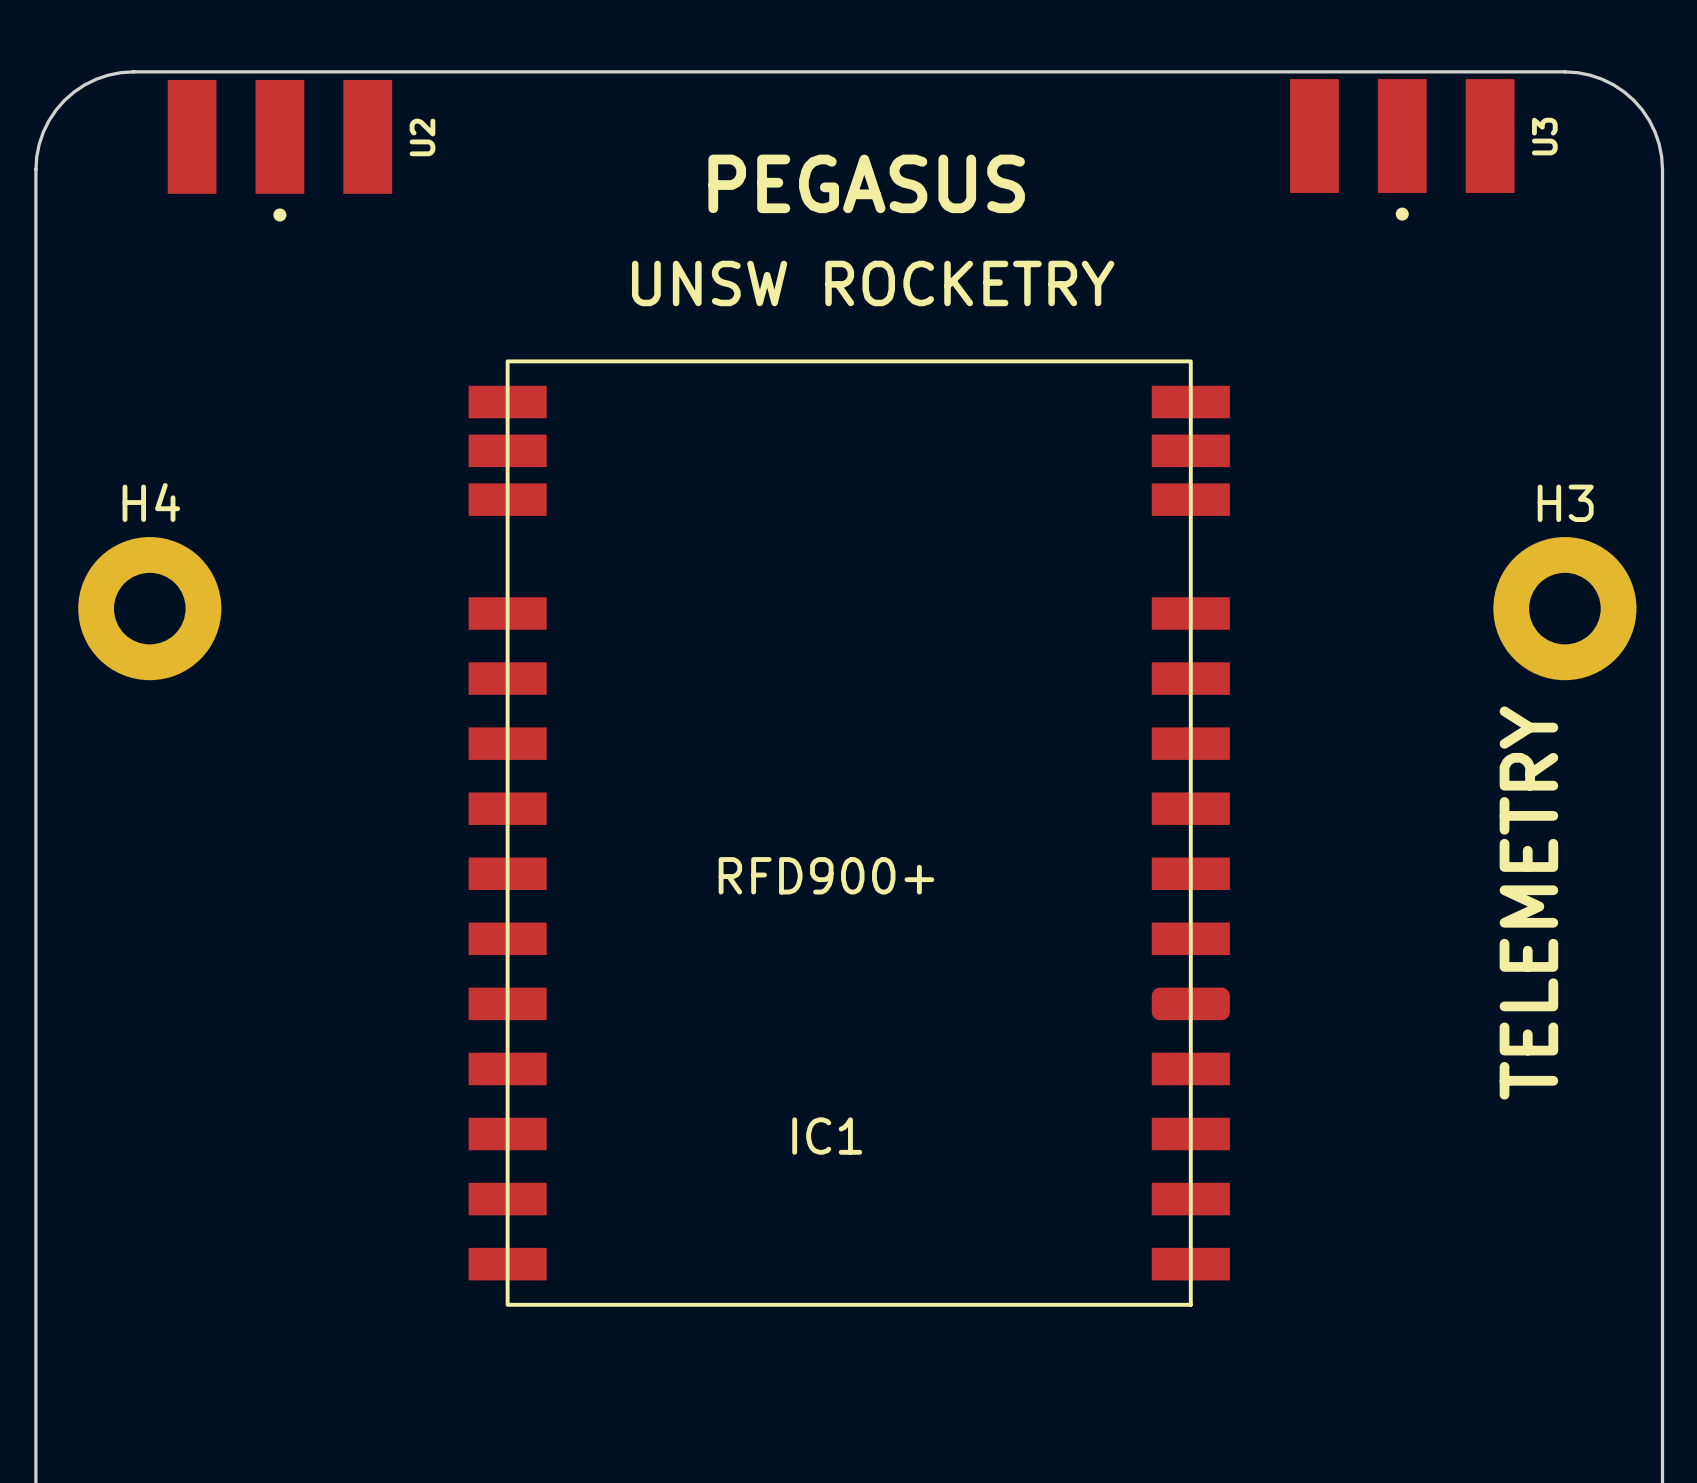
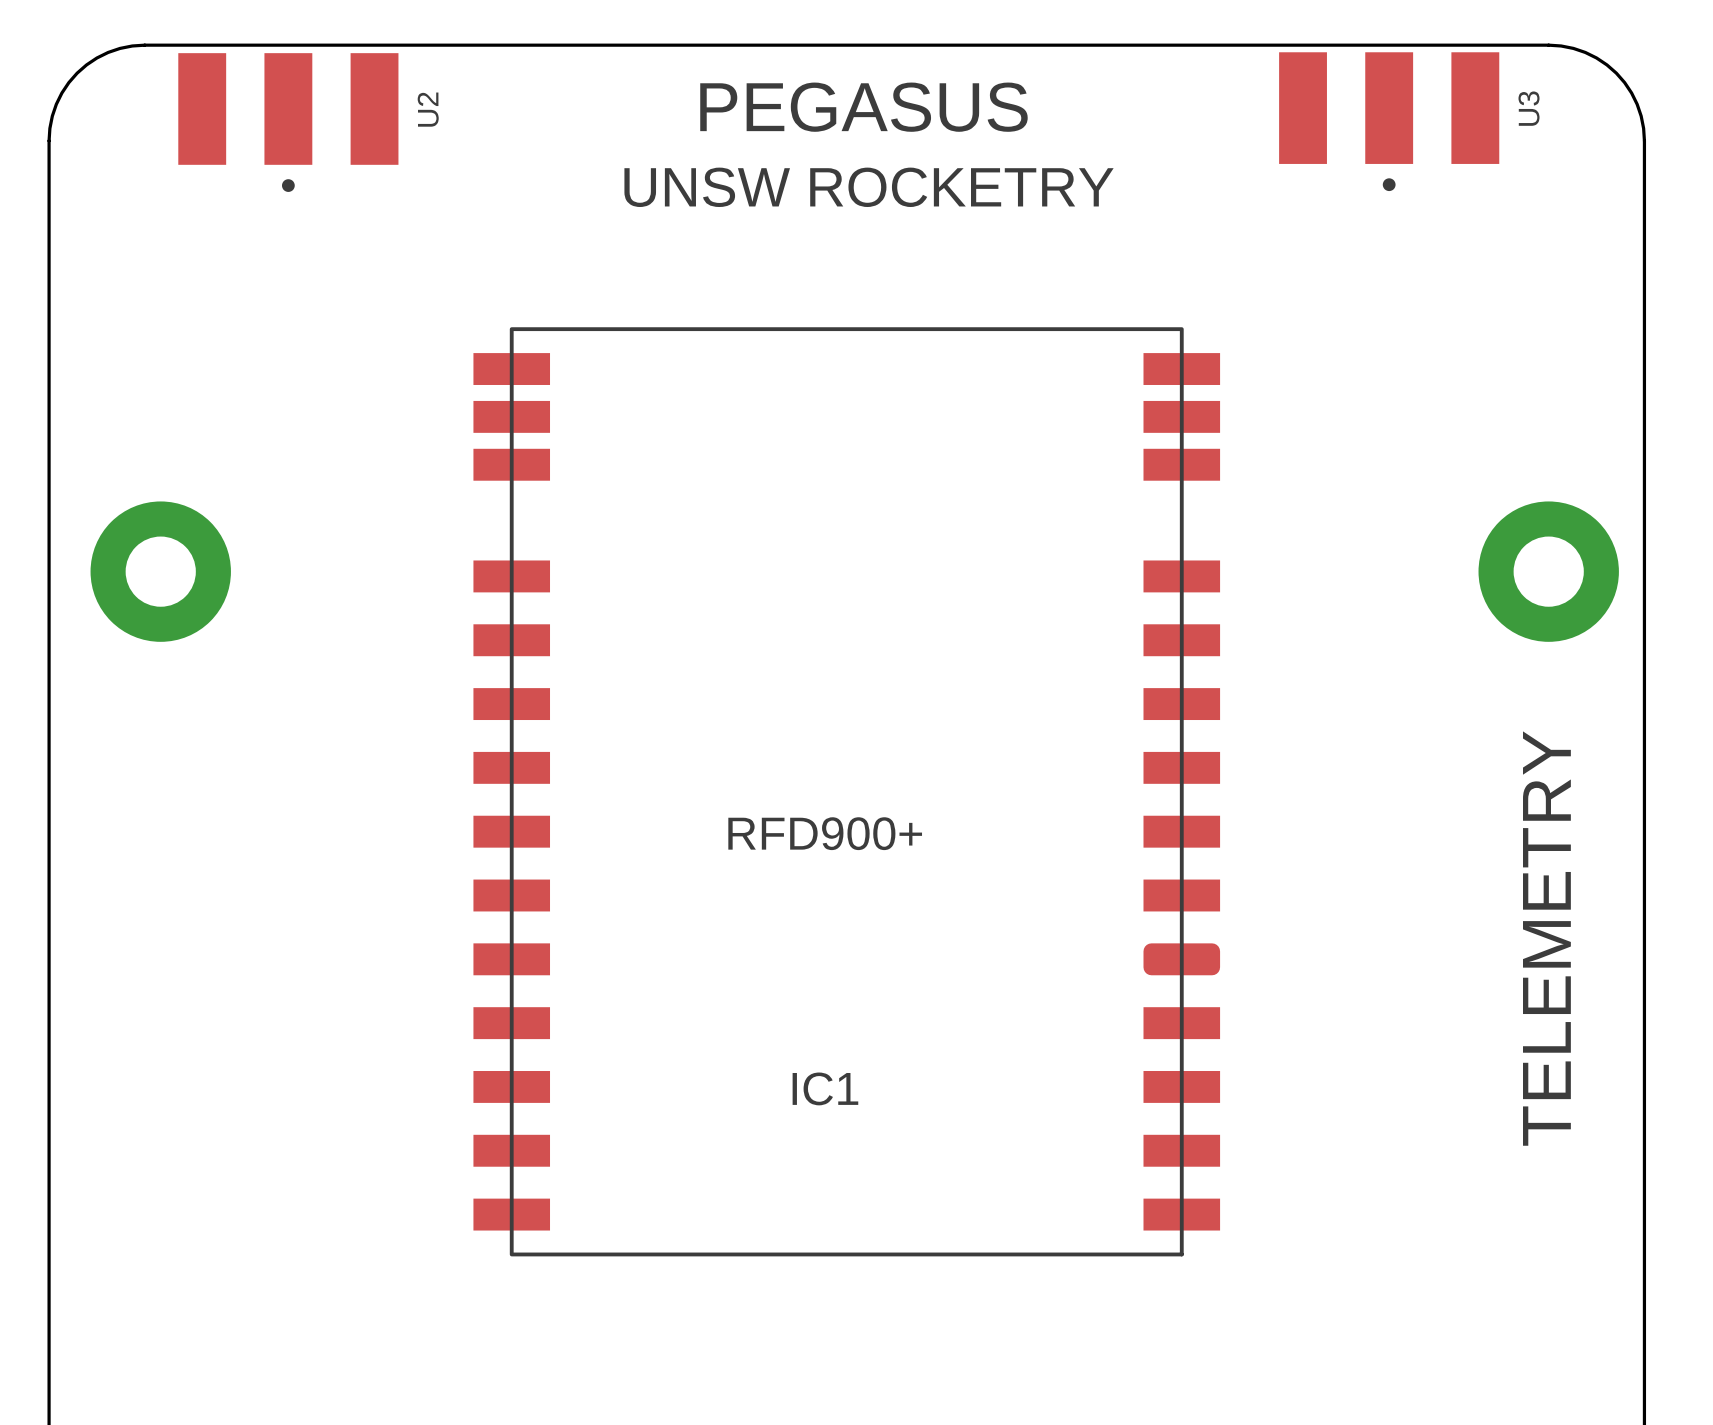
text position: PEGASUS (866, 183) -> PEGASUS (863, 107)
text position: UNSW ROCKETRY (873, 283) -> UNSW ROCKETRY (869, 187)
H4 name: H4 (151, 502) -> none
H3 name: H3 (1565, 503) -> none
text position: TELEMETRY (1528, 903) -> TELEMETRY (1546, 938)

